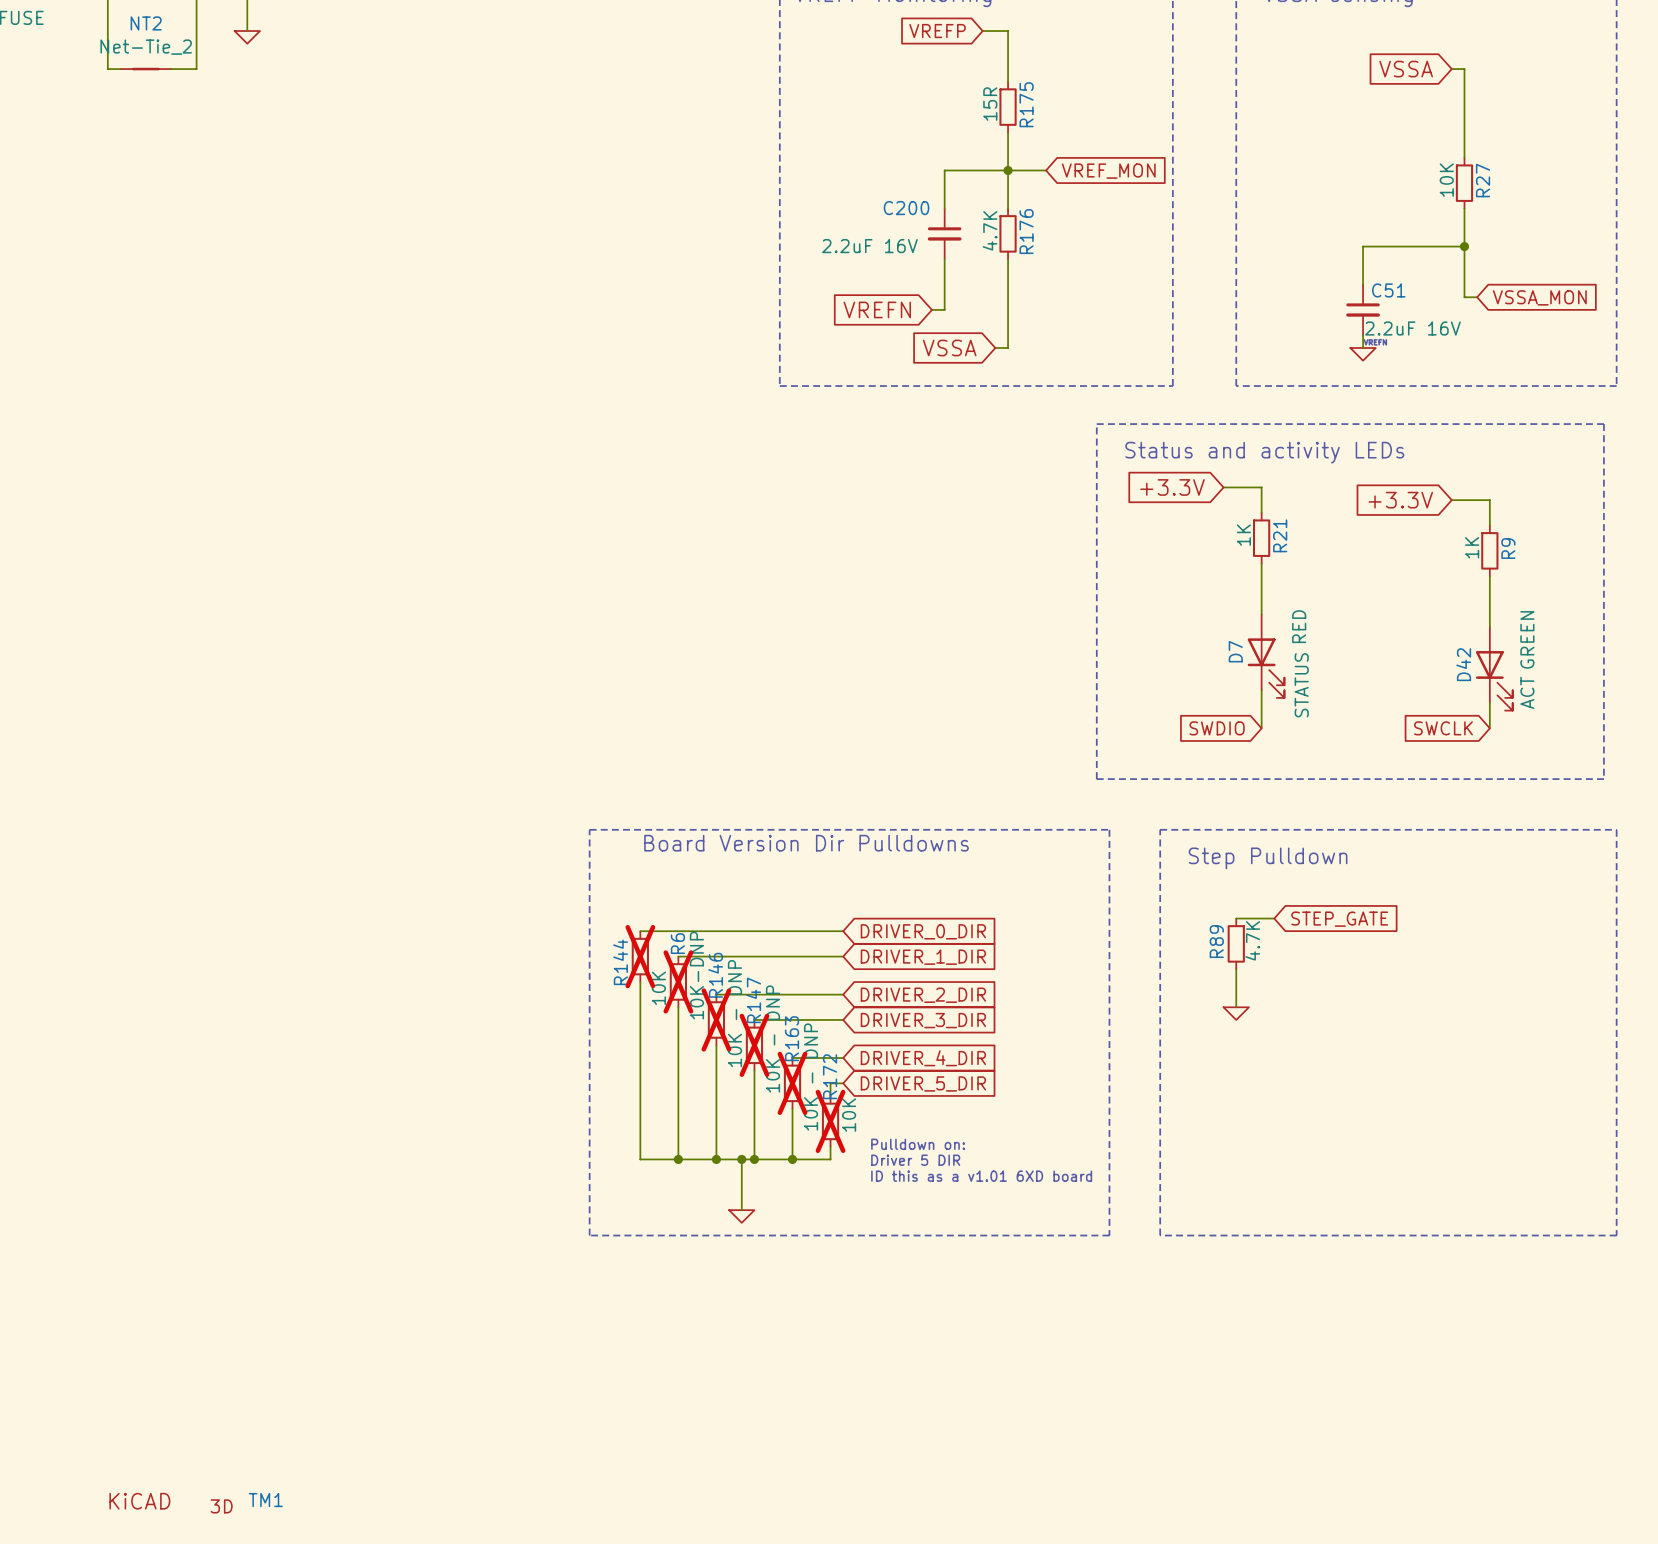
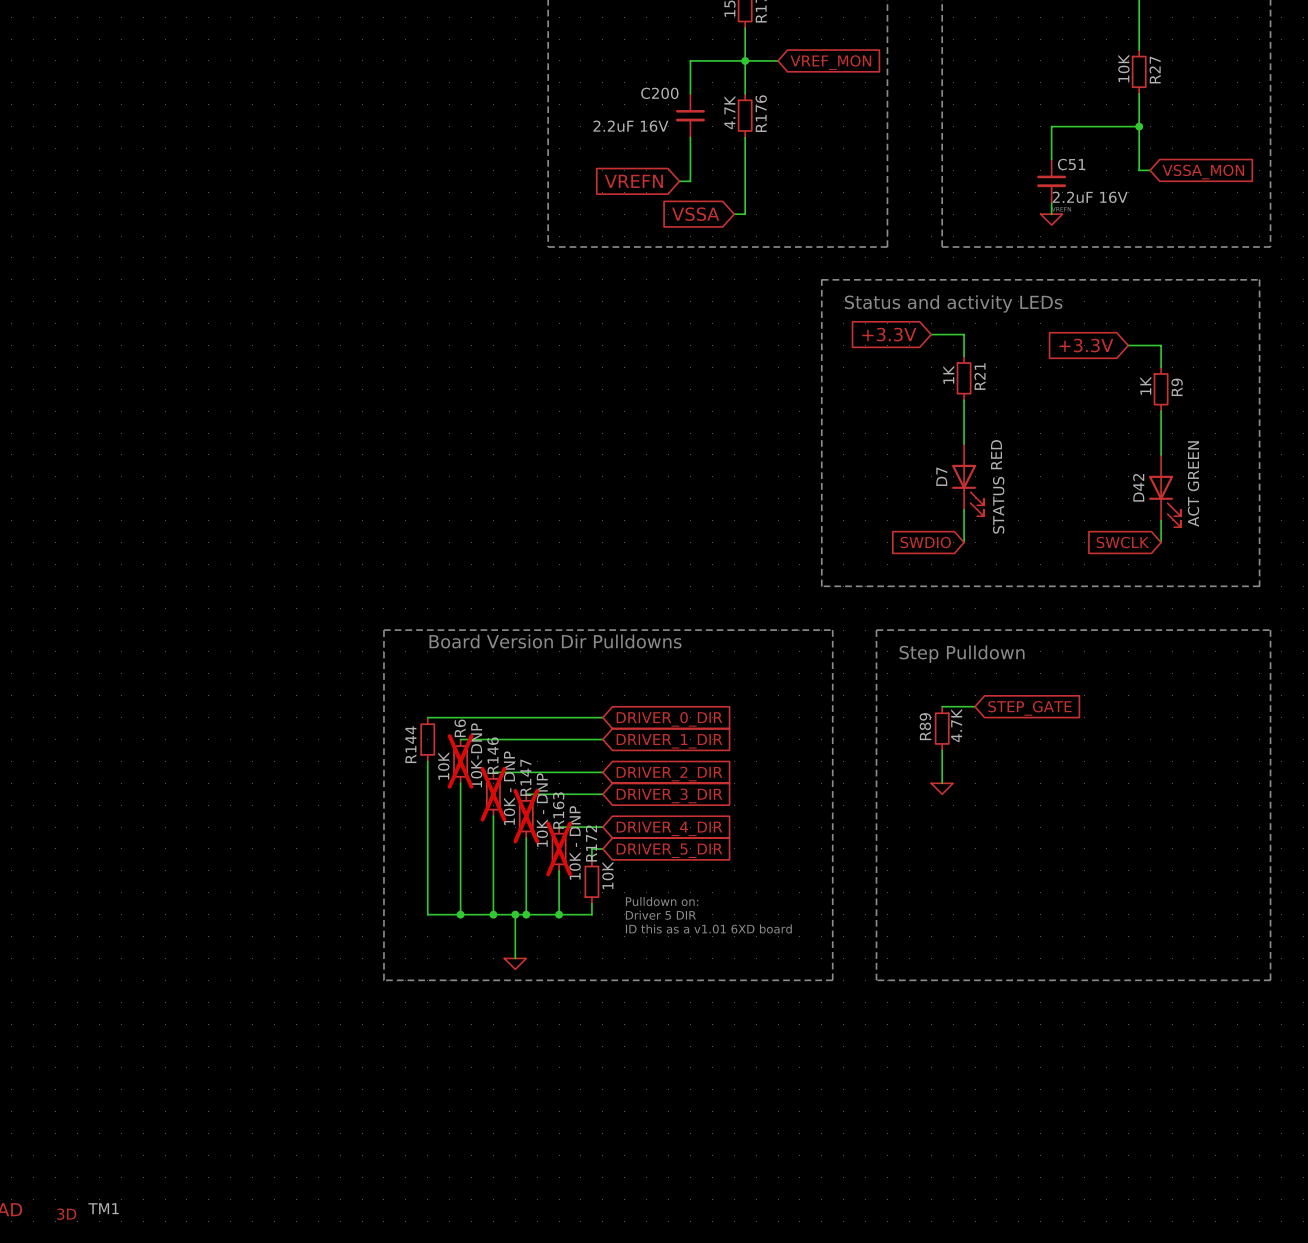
R144 do-not-place cross: (640, 956) -> none
R172 do-not-place cross: (830, 1121) -> none

